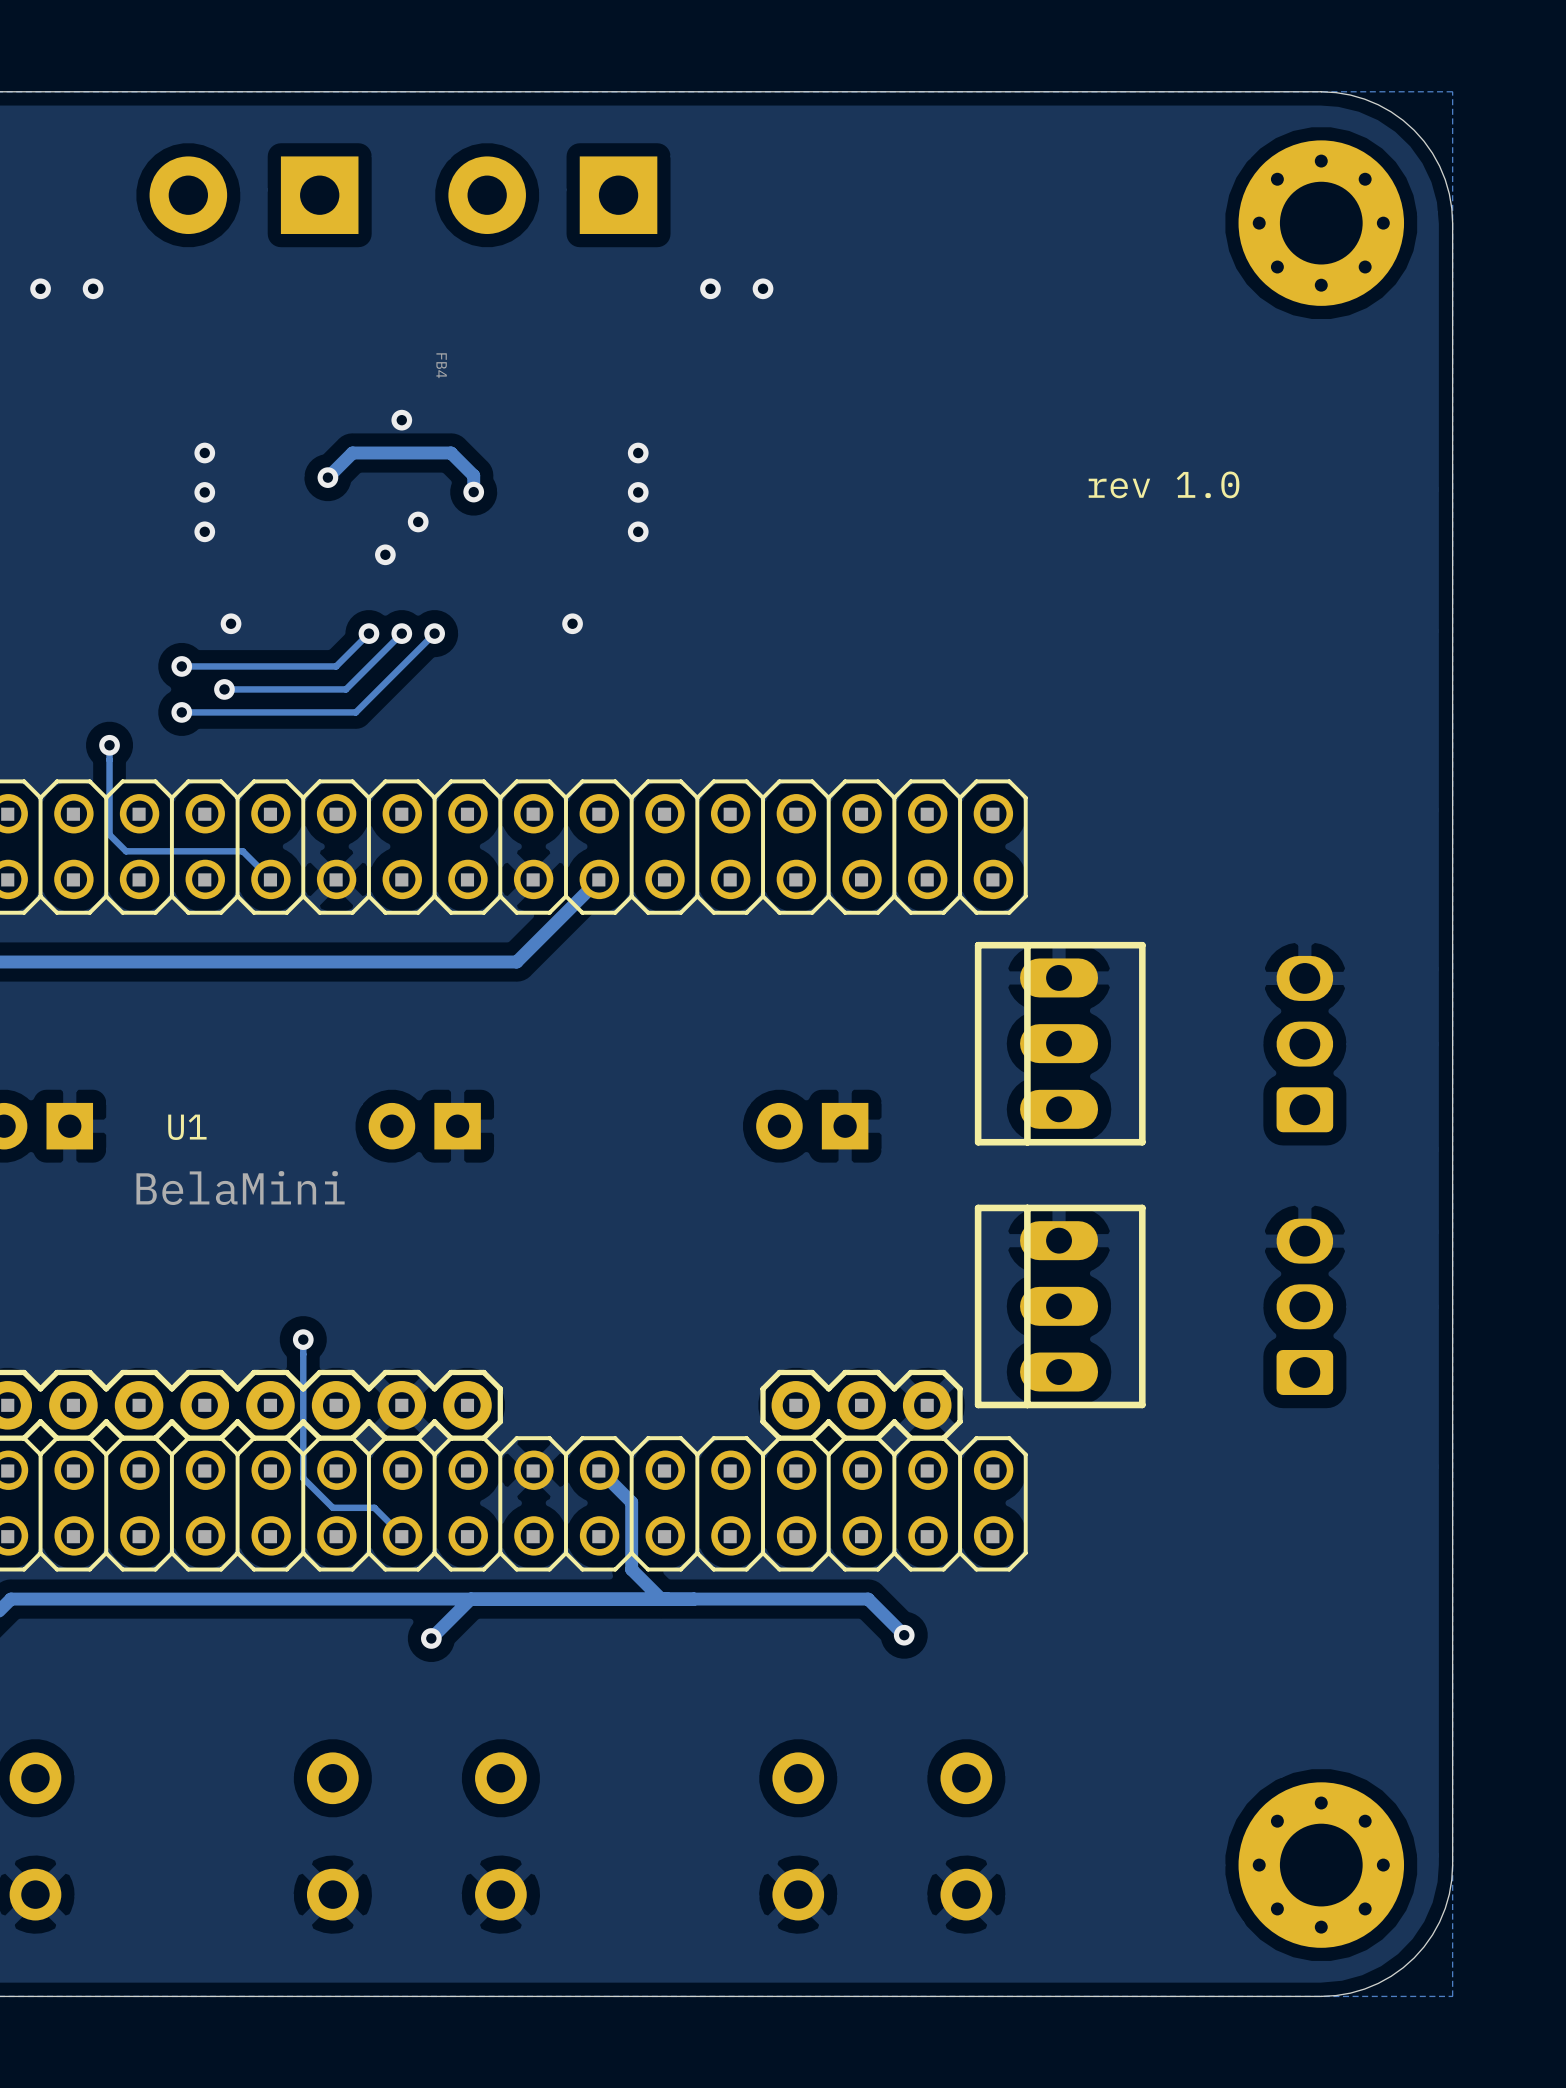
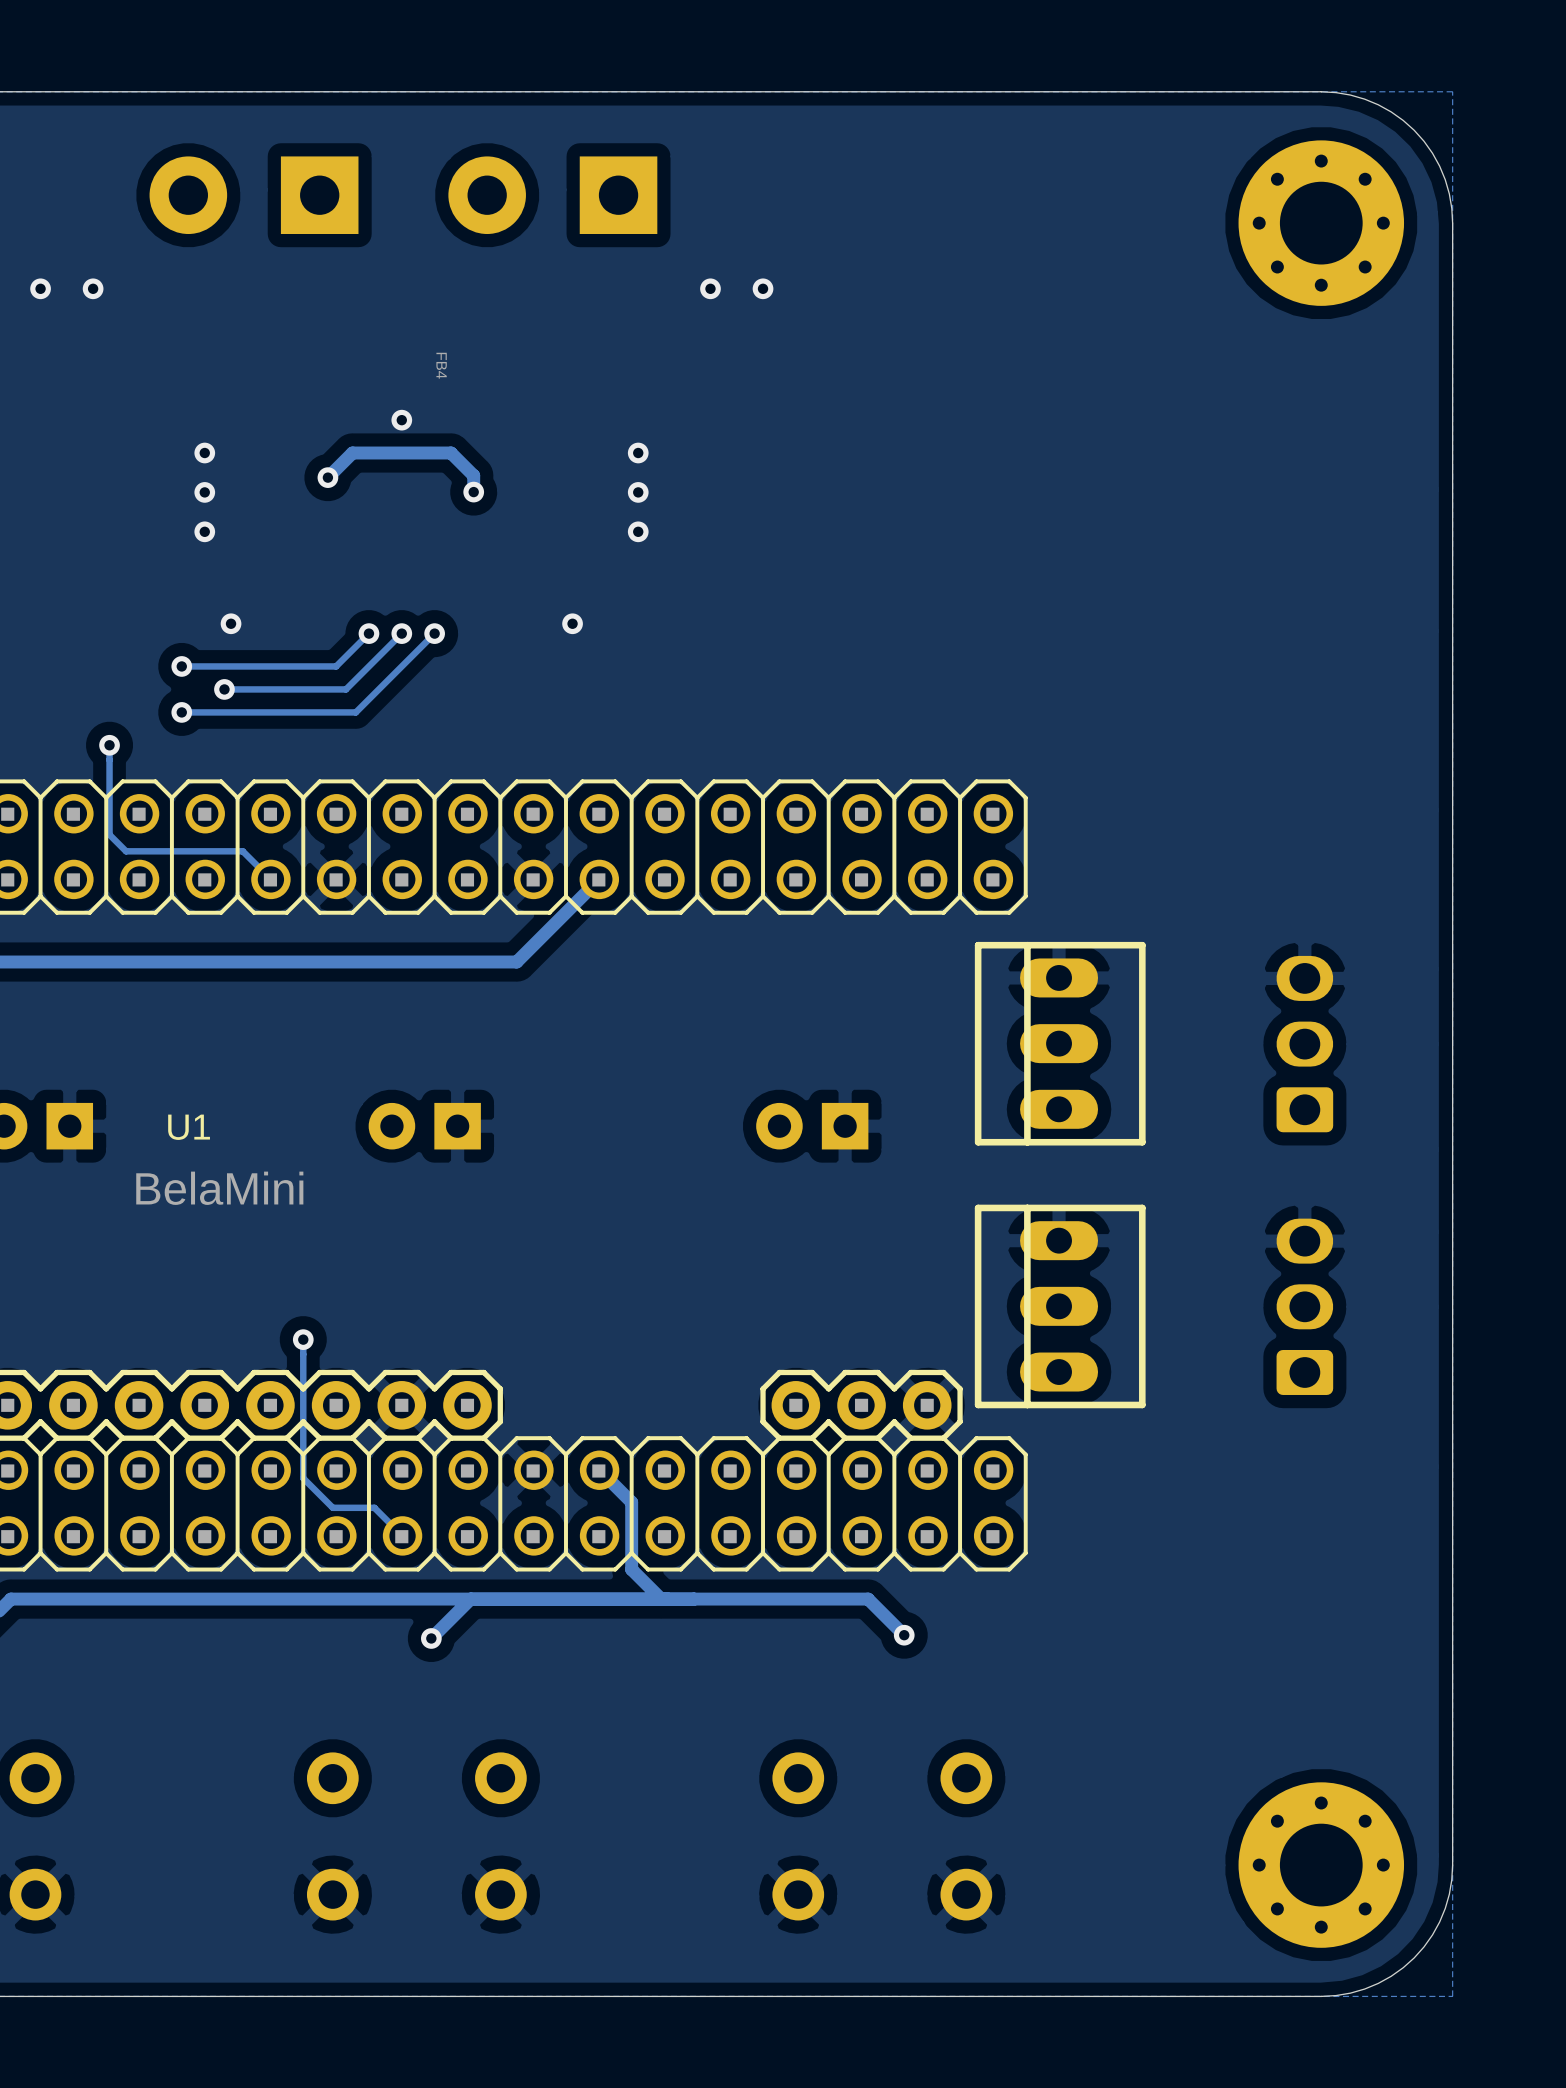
text: rev 1.0 (1164, 484) -> none
via: (418, 521) -> none
via: (385, 554) -> none

